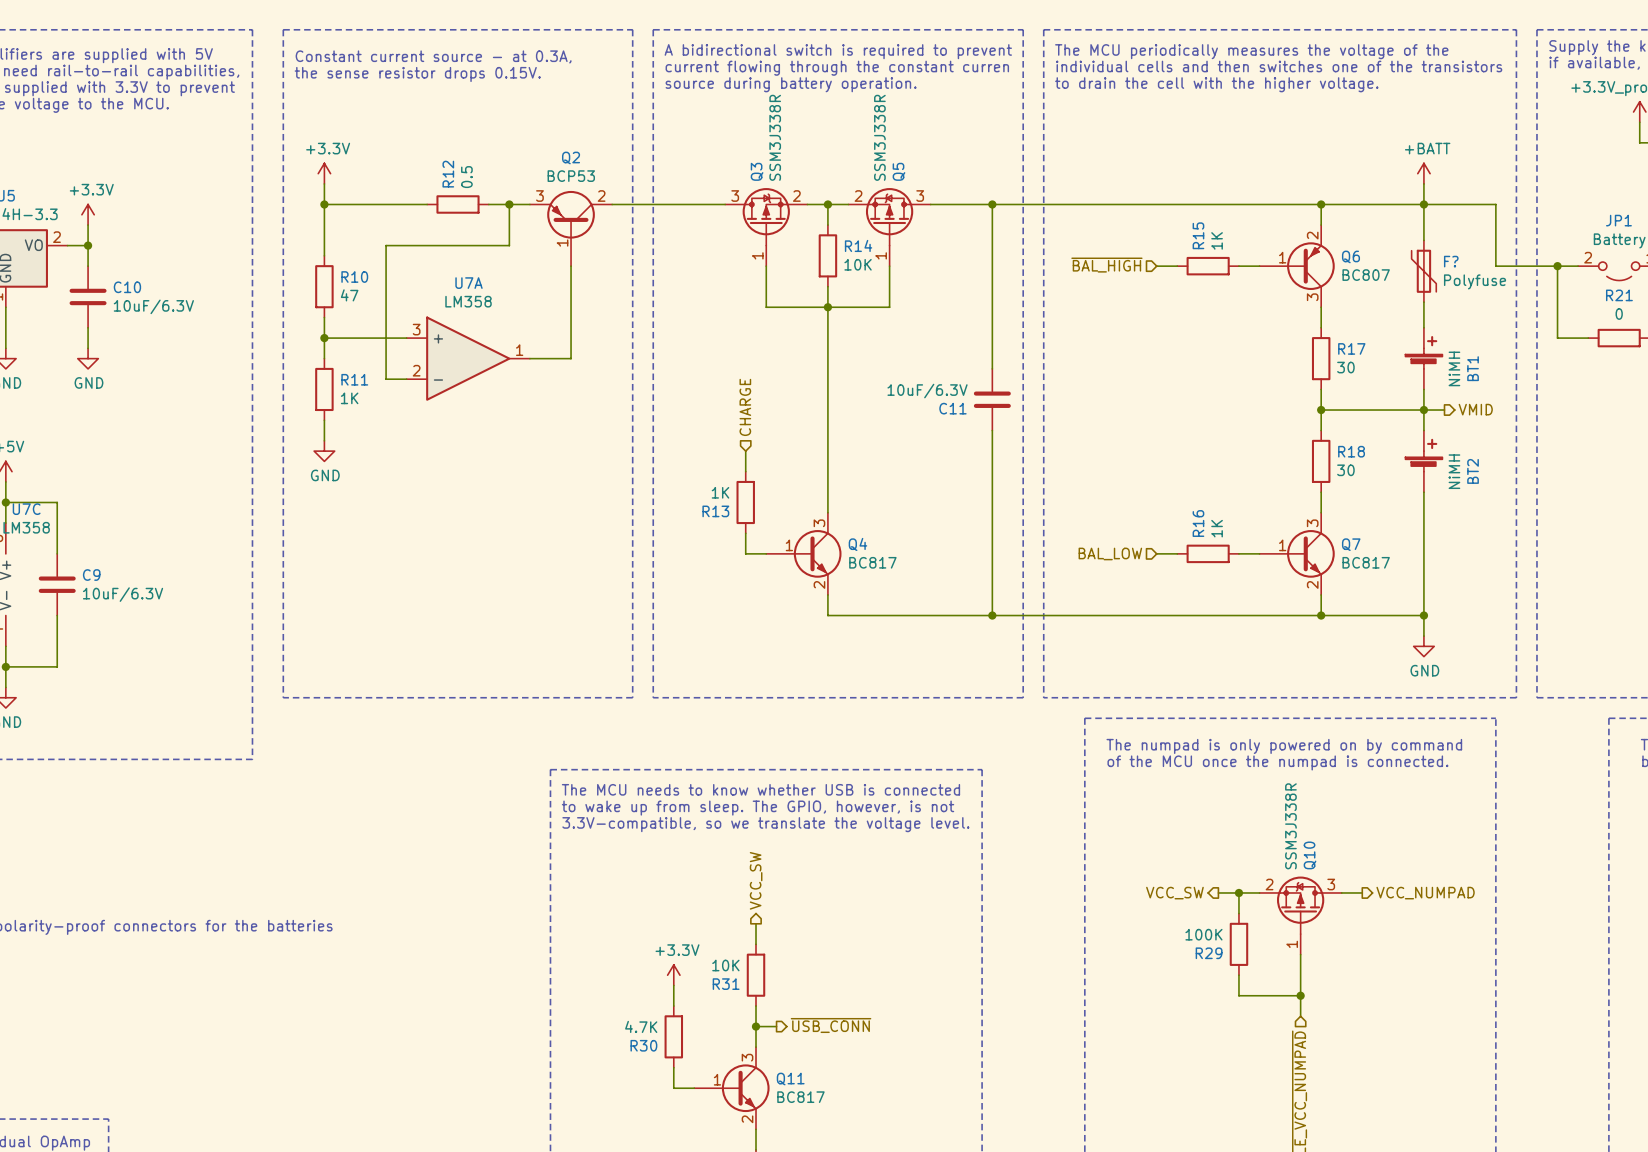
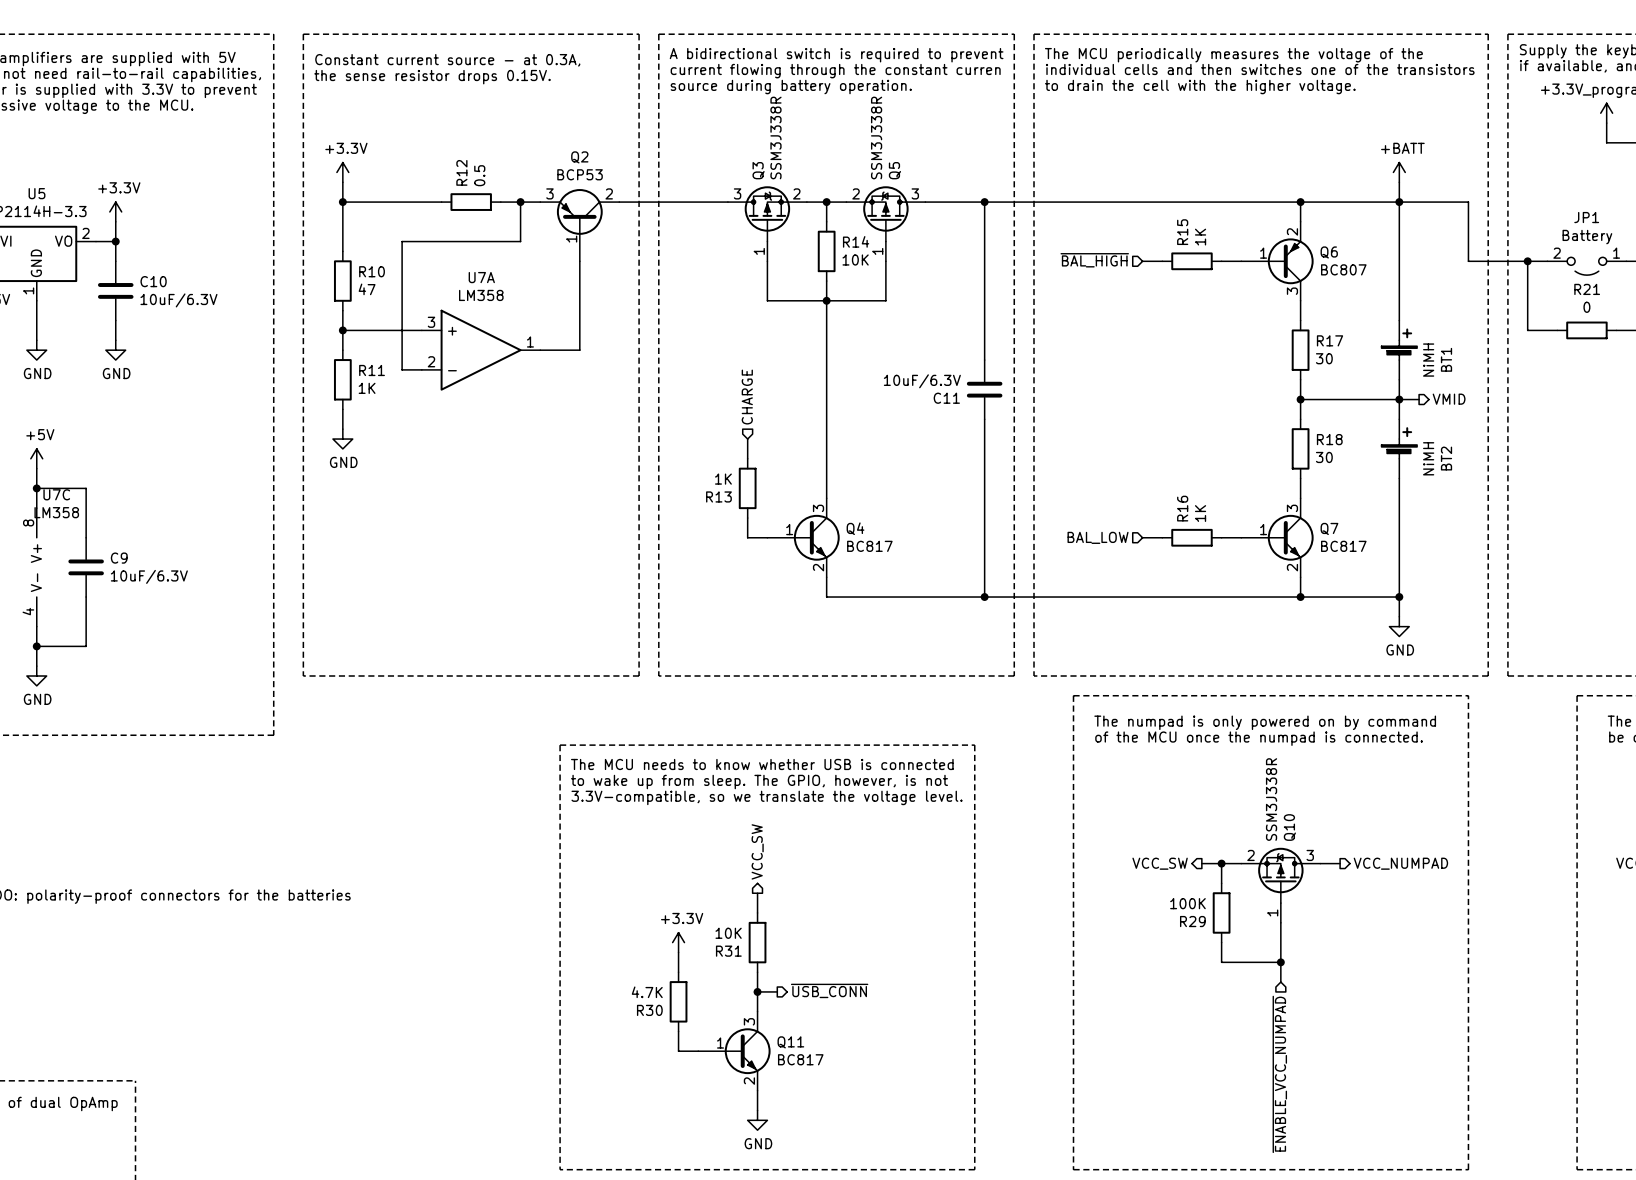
F?: Polyfuse (1423, 271) -> none

